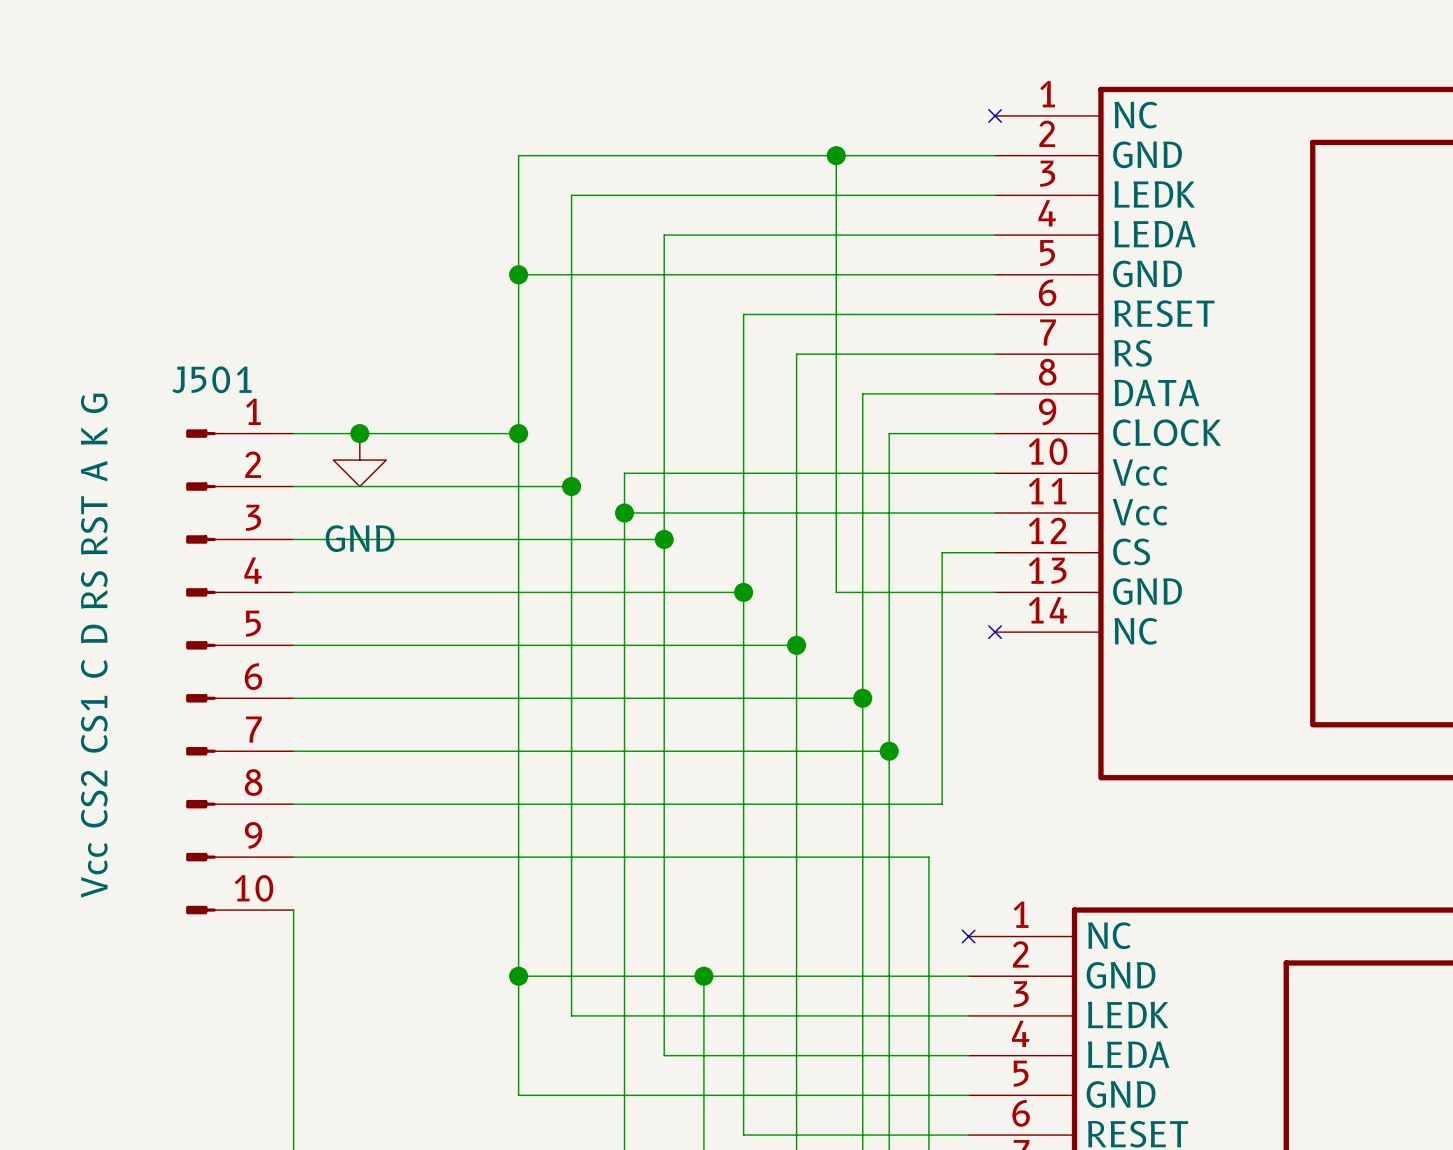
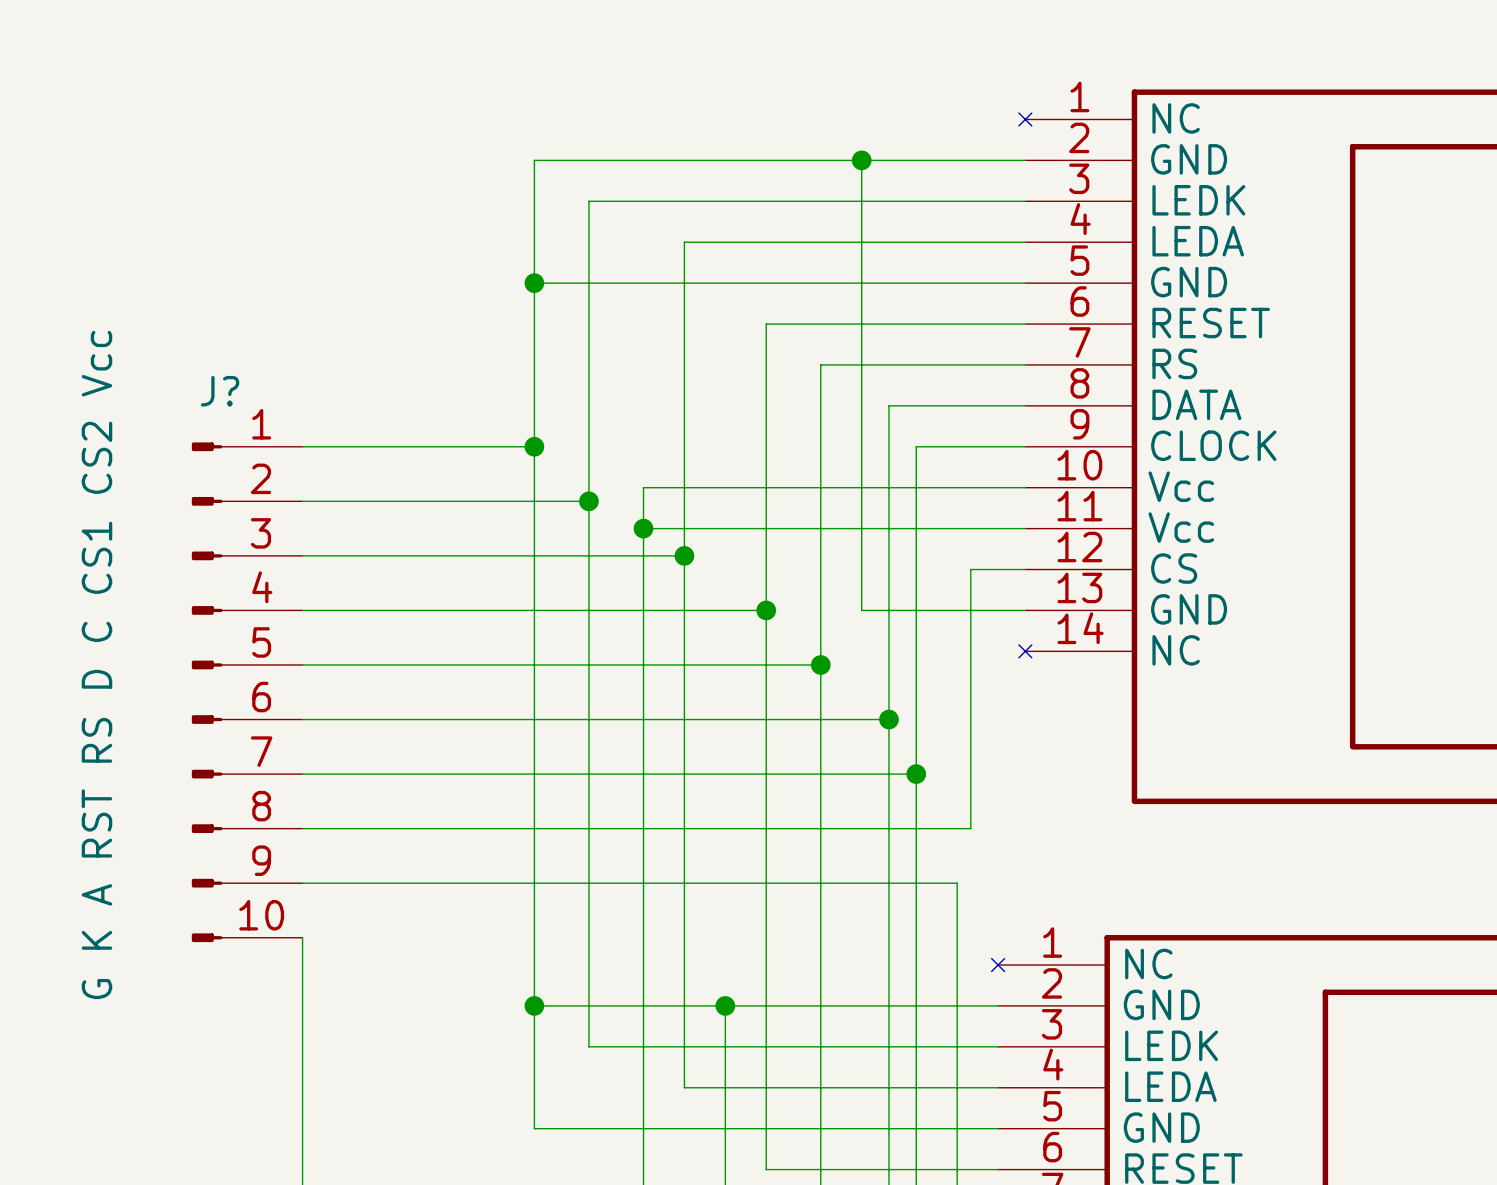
J501 name: J501 (212, 379) -> J? (220, 391)
junction: (359, 433) -> none
power symbol: GND (359, 460) -> none
J501 value: Vcc CS2 CS1 C D RS RST A K G (94, 645) -> G K A RST RS D C CS1 CS2 Vcc (96, 664)

